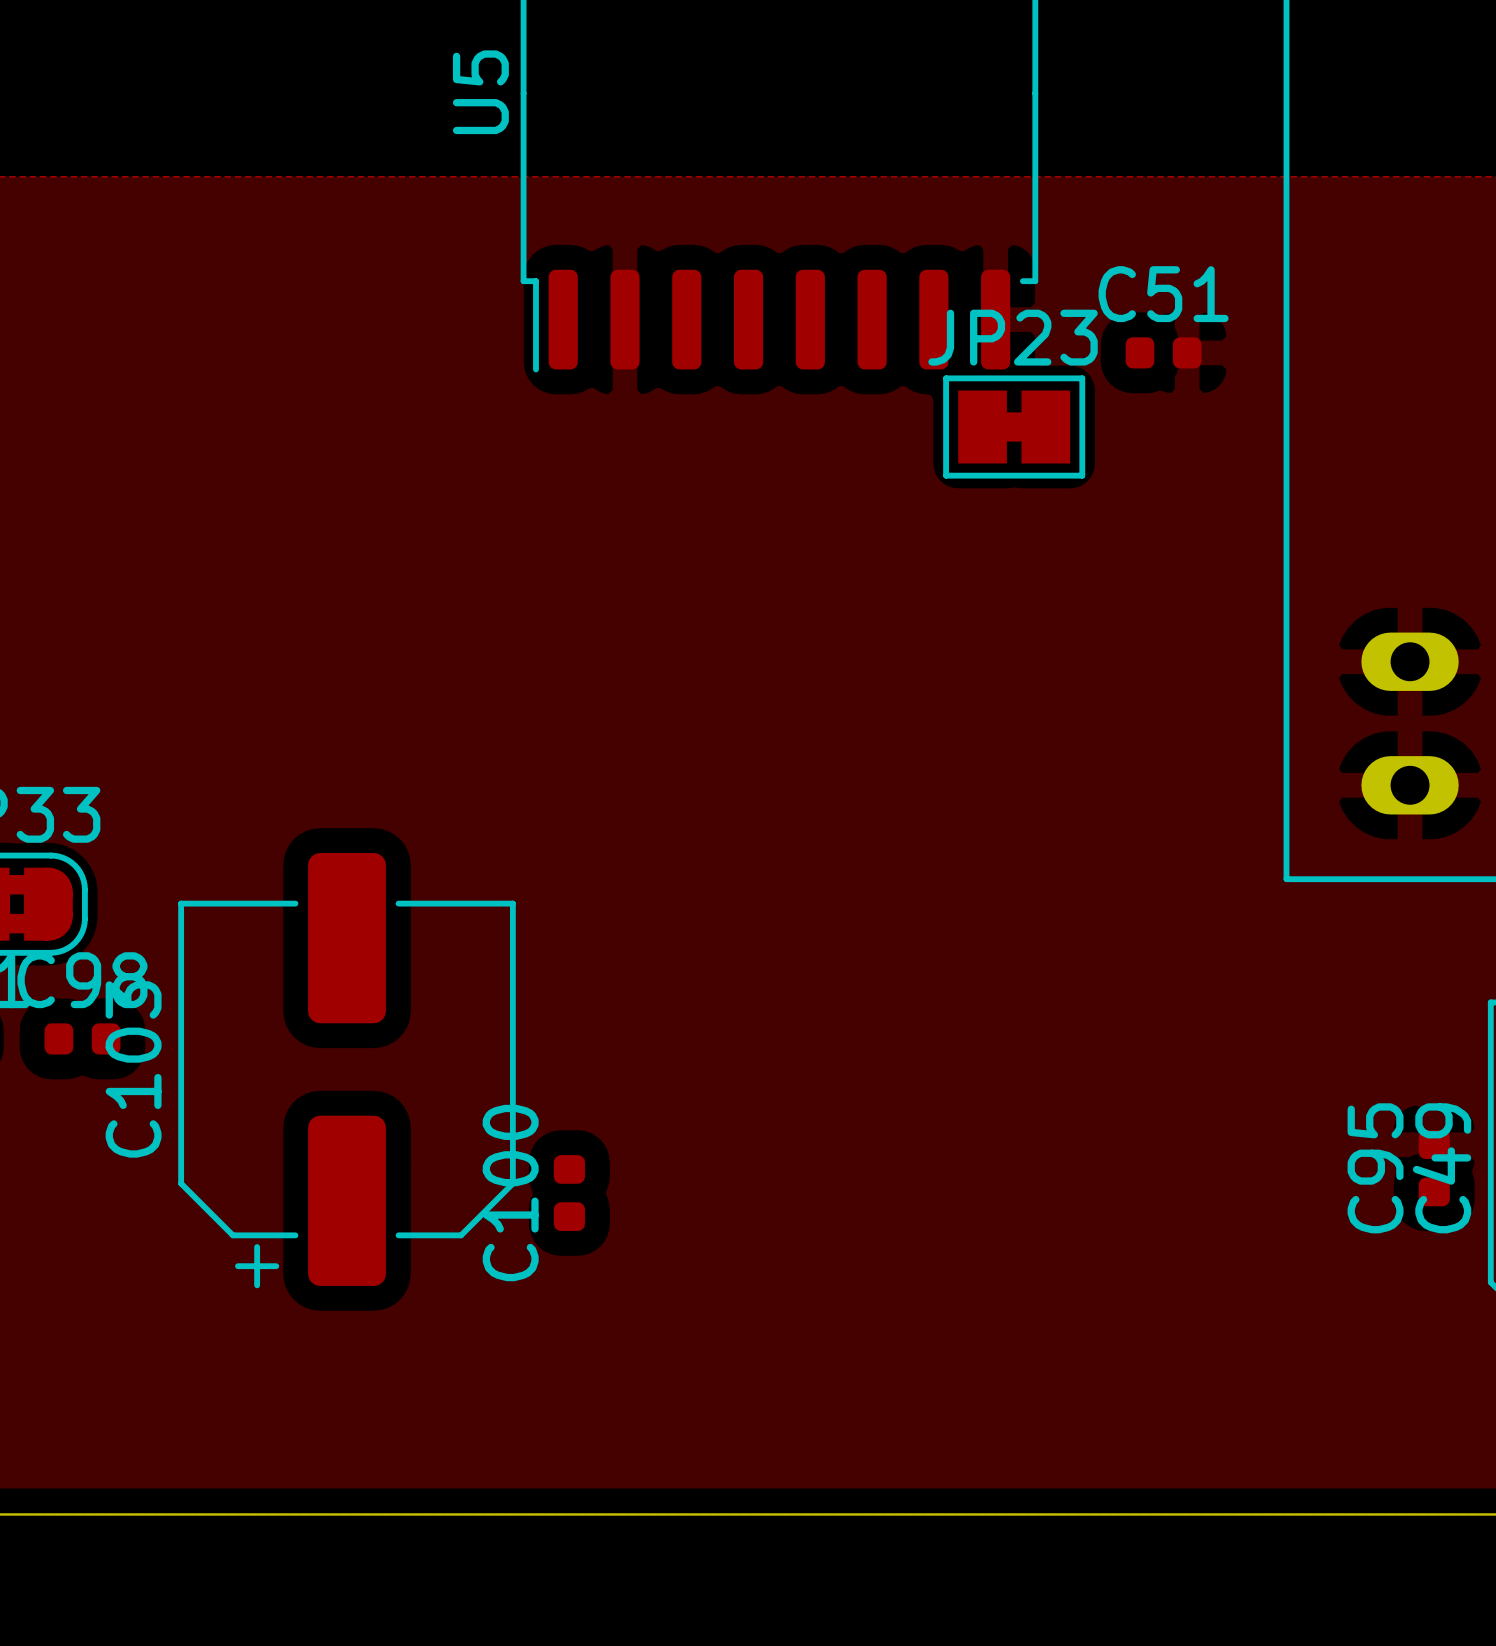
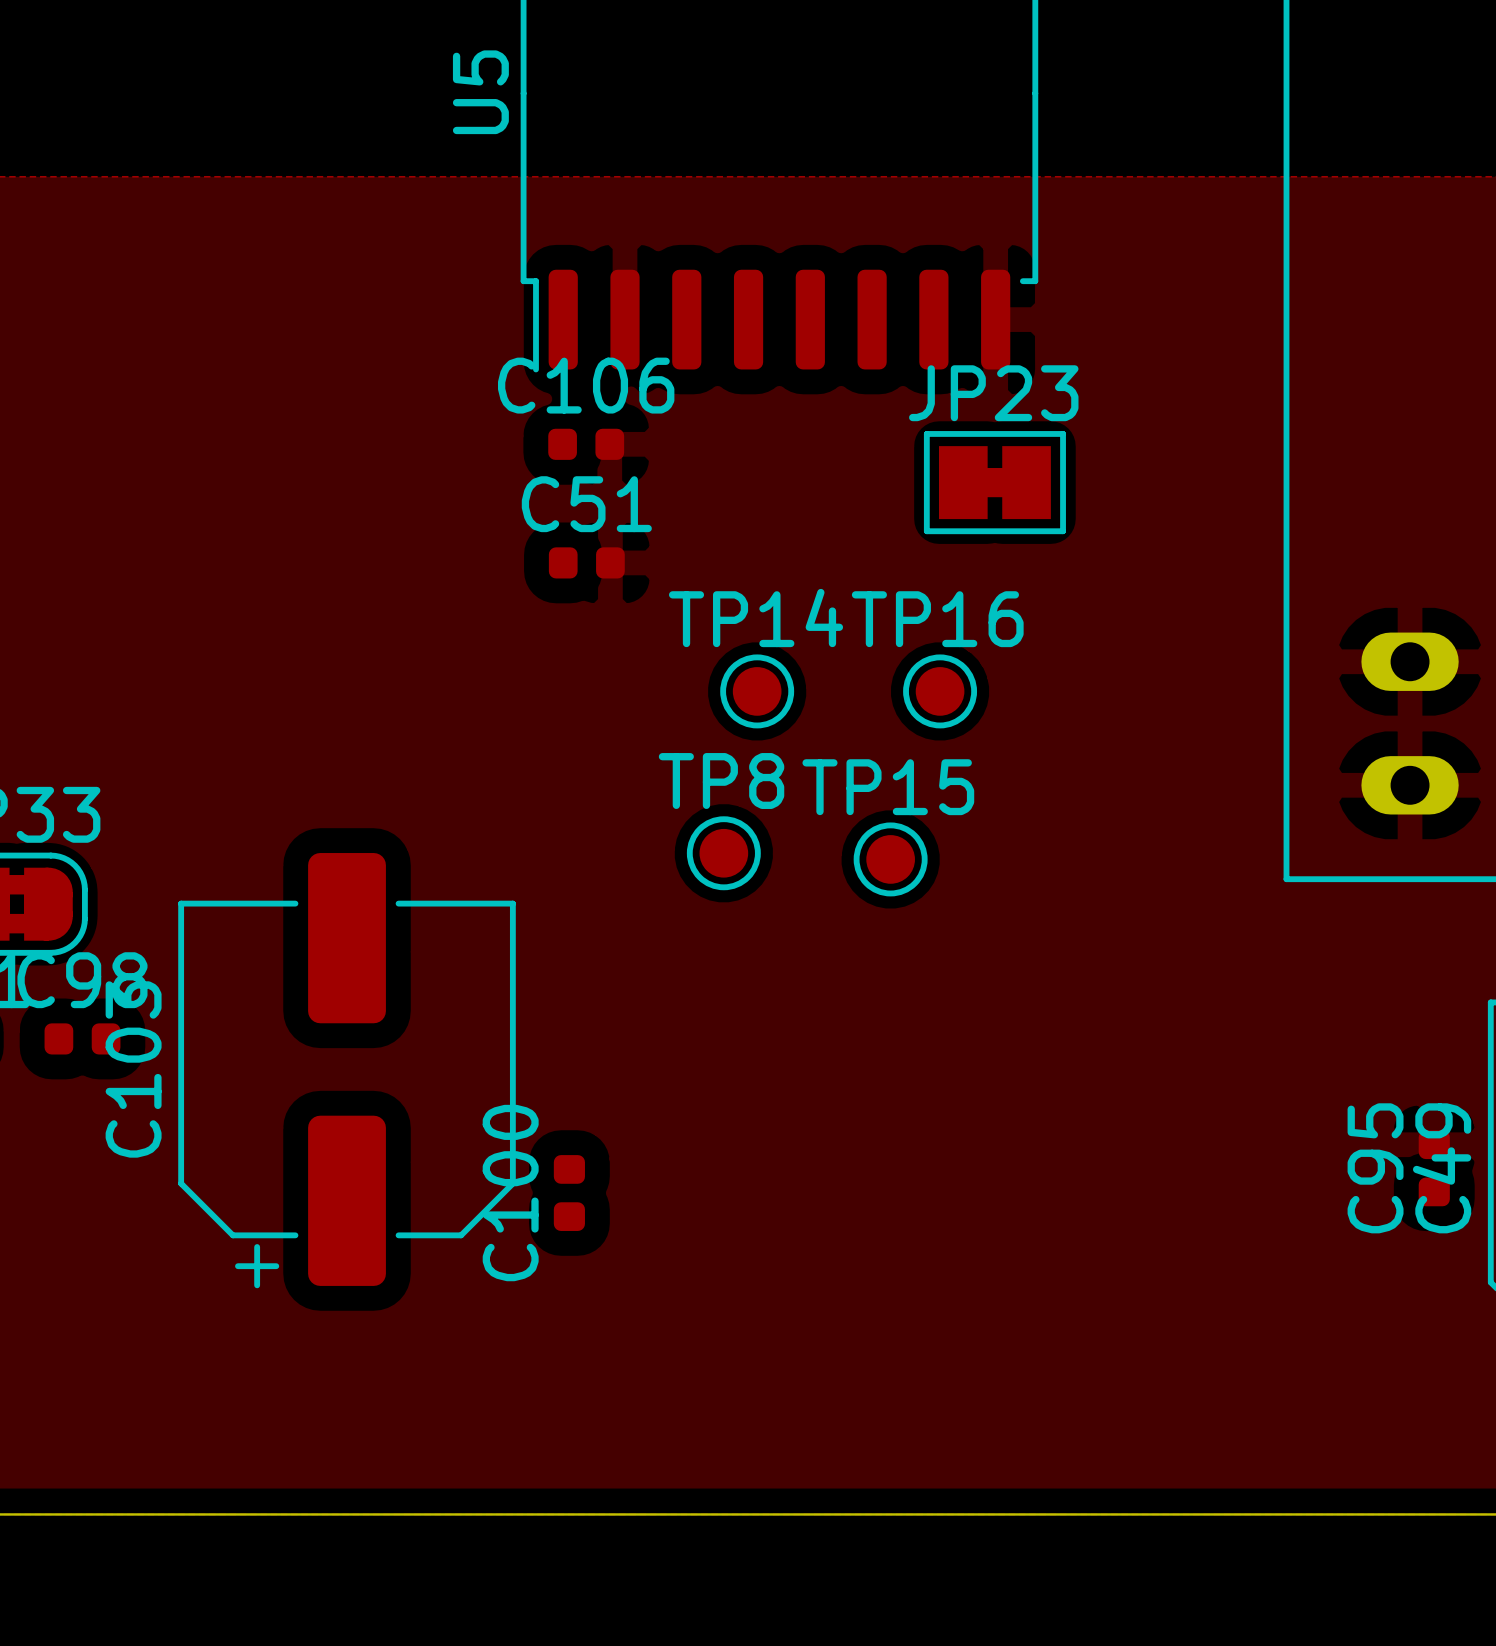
C51 position: (1163, 352) -> (586, 562)
JP23 position: (1014, 427) -> (994, 482)
C106: none -> (586, 444)
TP14: none -> (757, 691)
TP16: none -> (940, 691)
TP8: none -> (723, 853)
TP15: none -> (890, 859)

